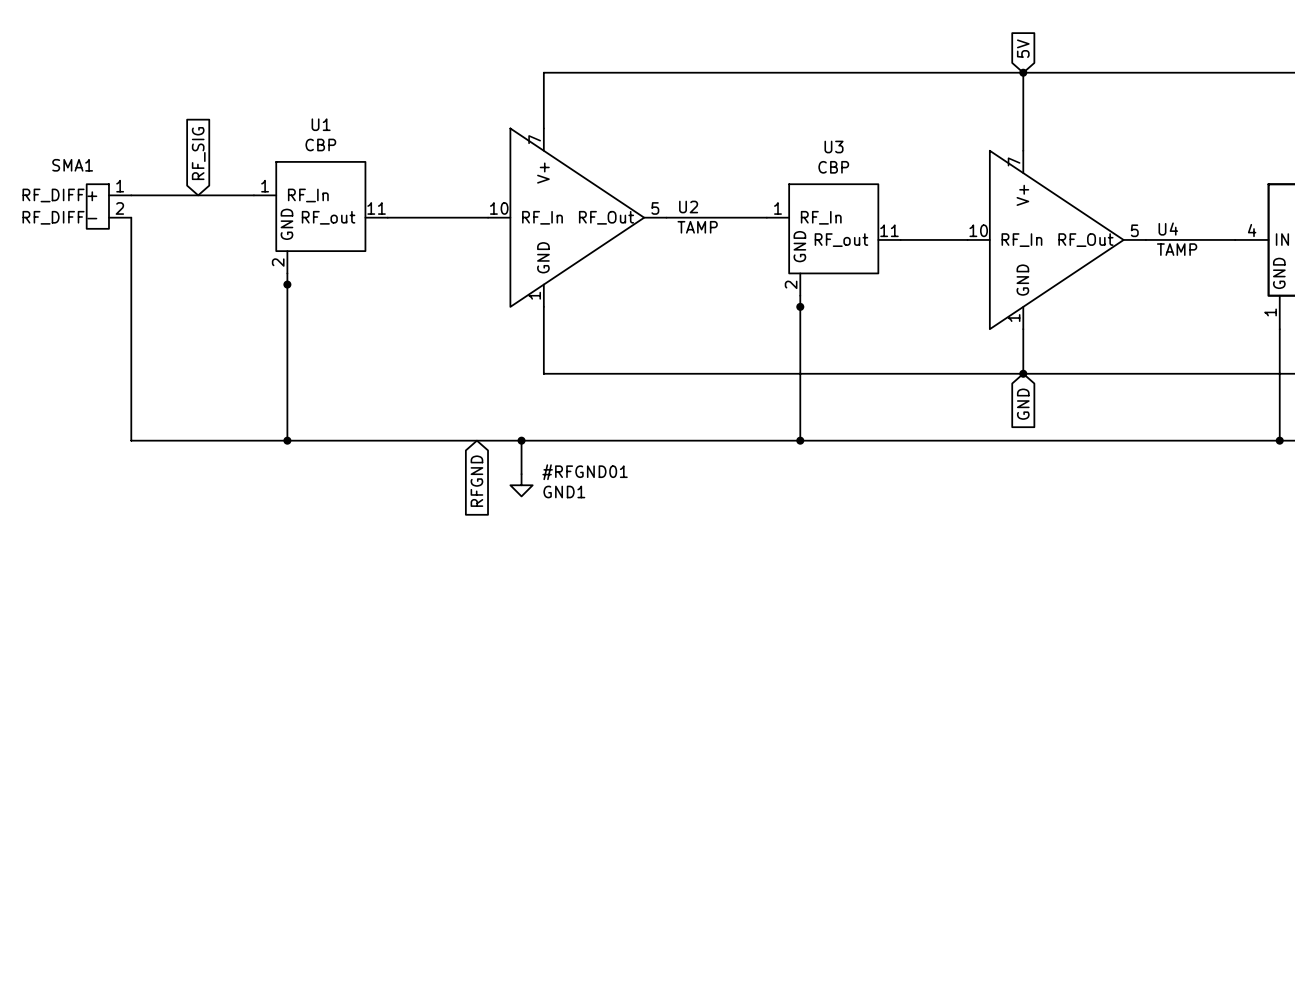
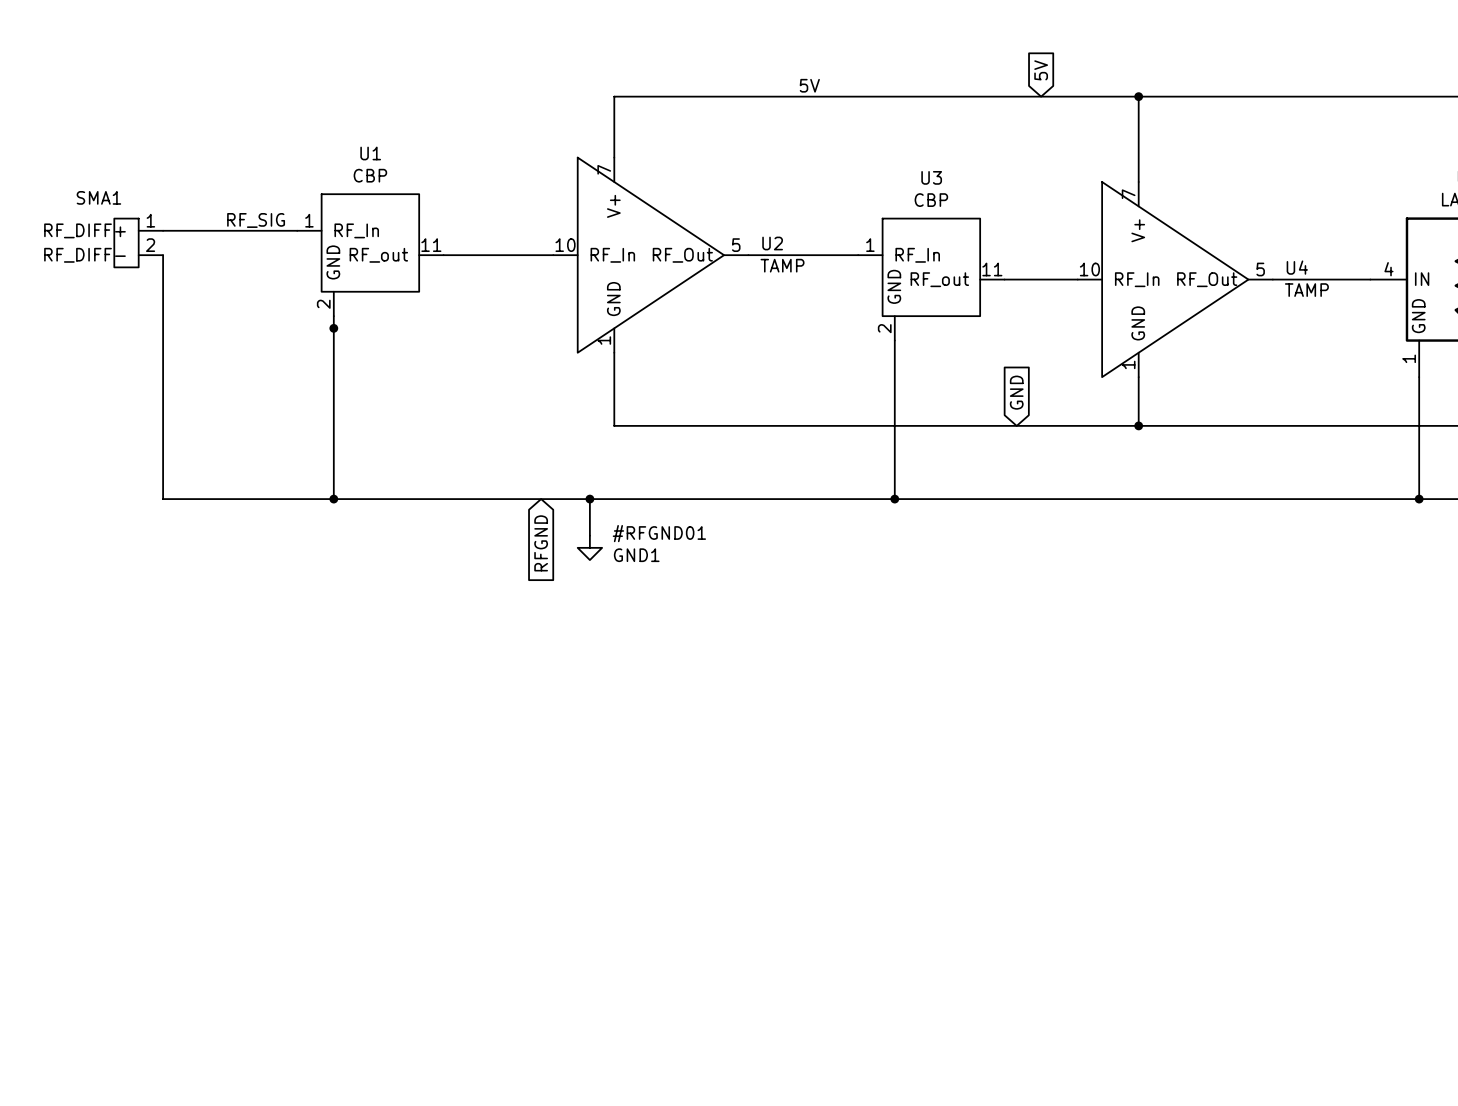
global label position: 5V (1023, 48) -> 5V (1041, 70)
label: none -> 5V (809, 85)
global label: RF_SIG (198, 153) -> none
label: none -> RF_SIG (256, 220)
junction: (800, 306) -> none
global label rotation: 0° (1023, 404) -> 180° (1016, 392)
global label position: GND (1023, 404) -> GND (1016, 392)

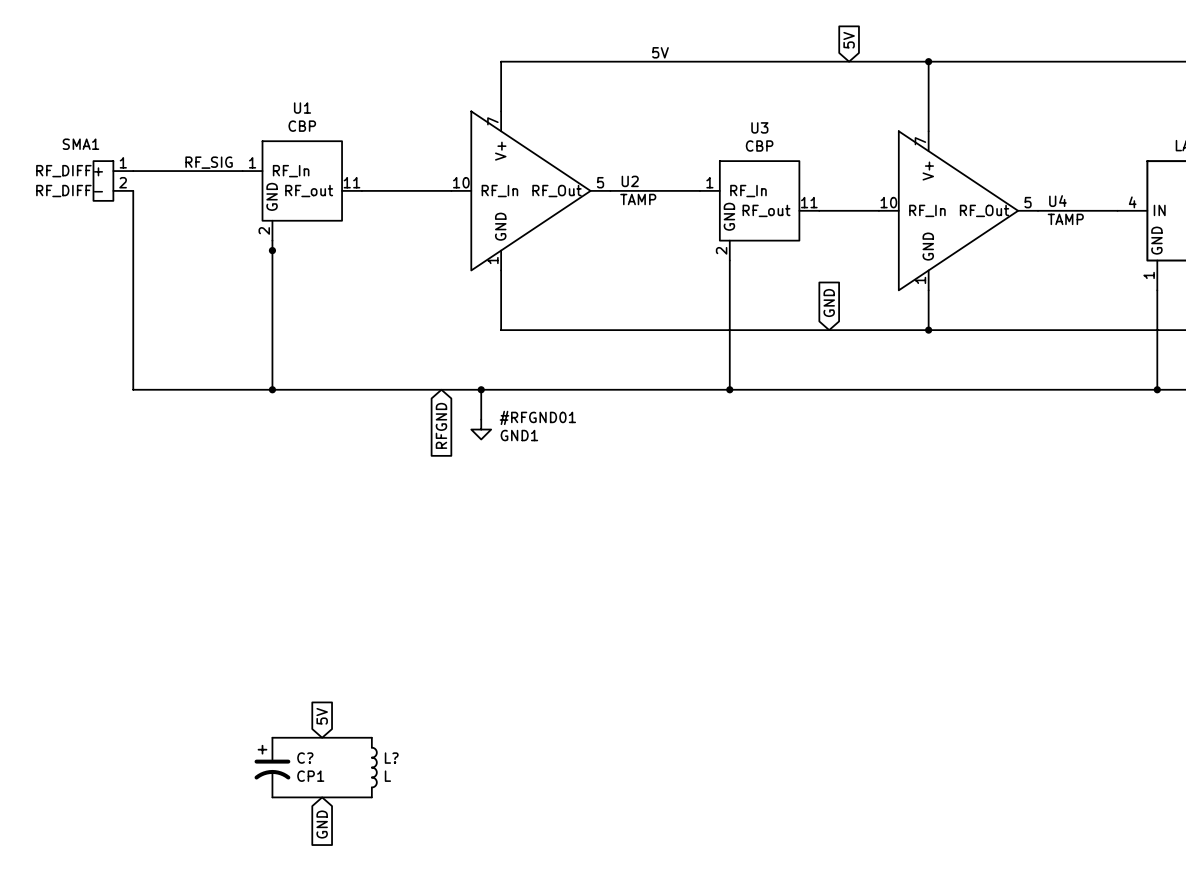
global label: none -> 5V (322, 716)
wire: none -> (272, 737) (371, 737)
C?: none -> CP1 (272, 767)
L?: none -> L (374, 767)
wire: none -> (272, 797) (371, 797)
global label: none -> GND (322, 824)

